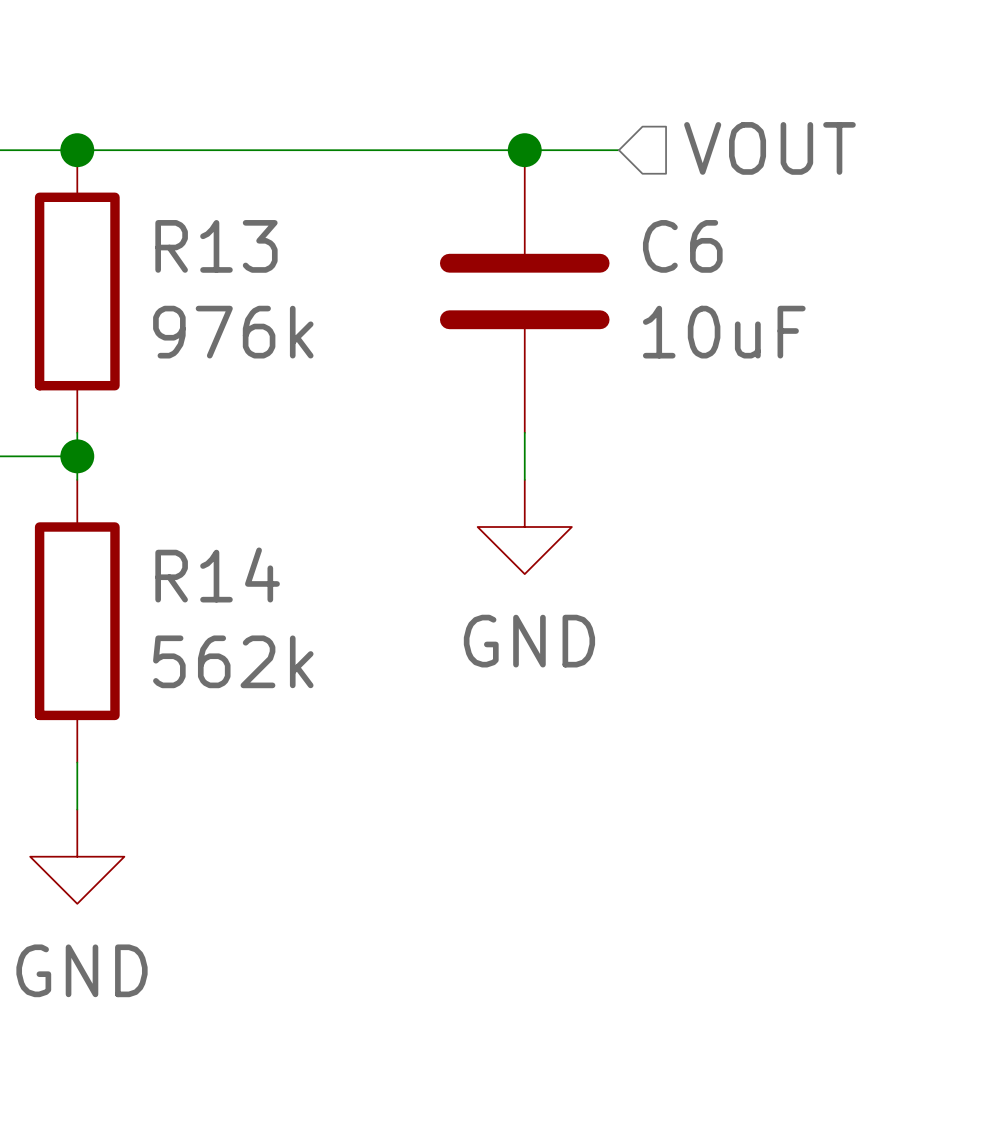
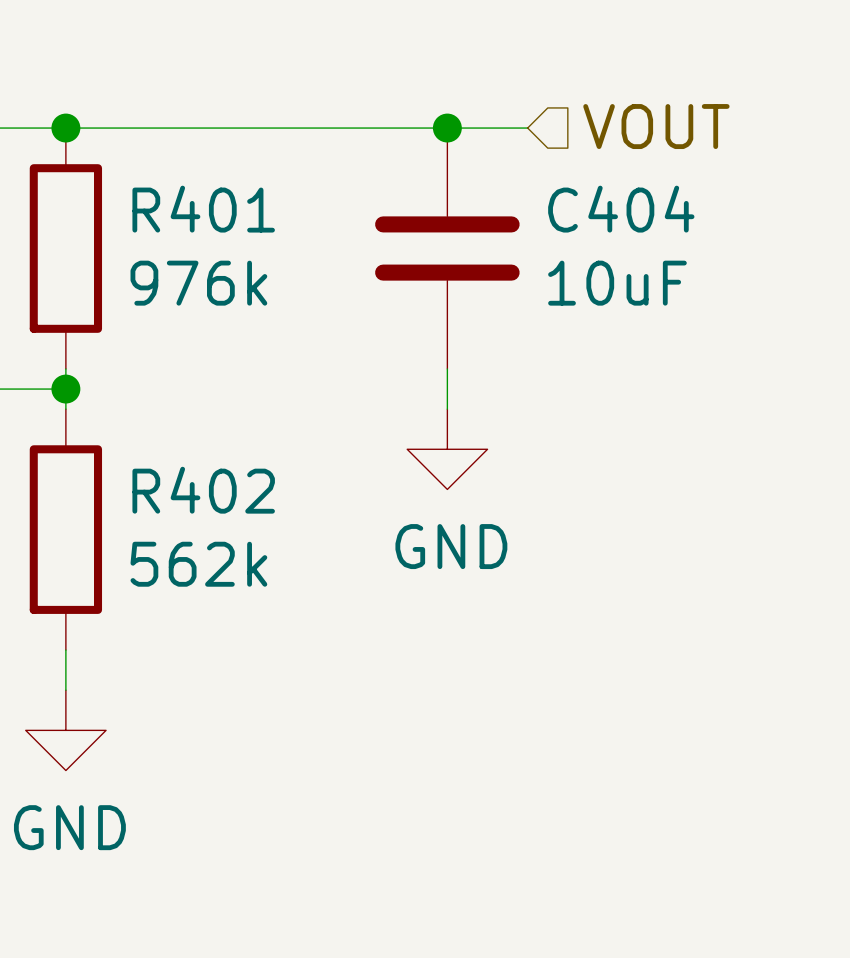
R13 name: R13 (216, 246) -> R401 (203, 209)
C6 name: C6 (682, 246) -> C404 (621, 209)
R14 name: R14 (217, 574) -> R402 (203, 490)

